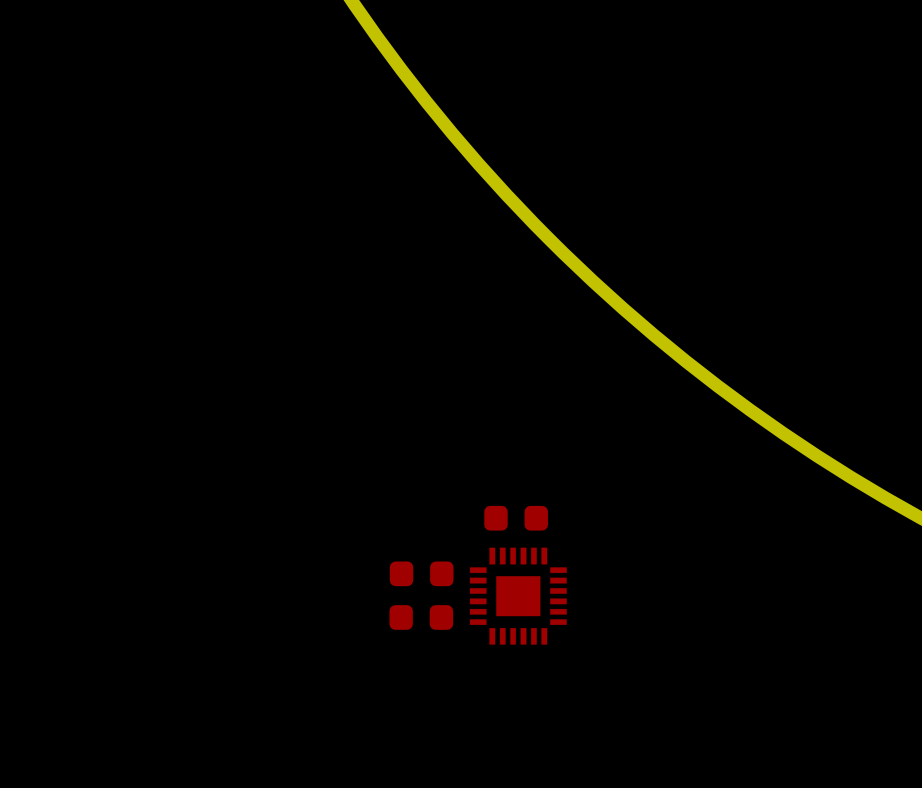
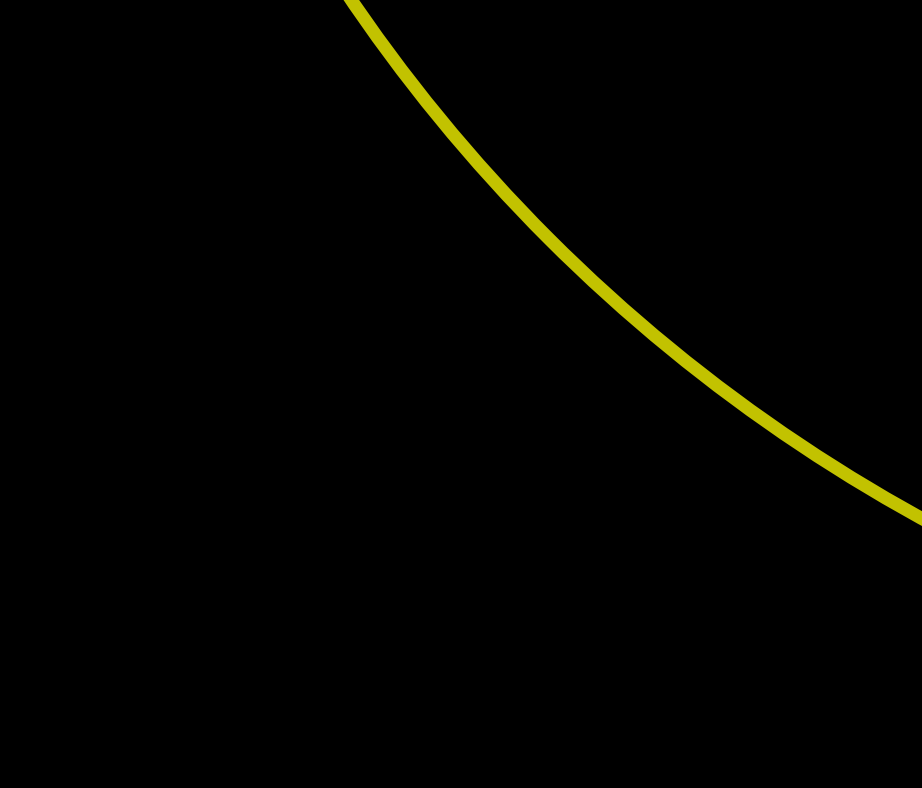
part: (516, 518) -> none
part: (421, 573) -> none
part: (518, 596) -> none
part: (421, 617) -> none

